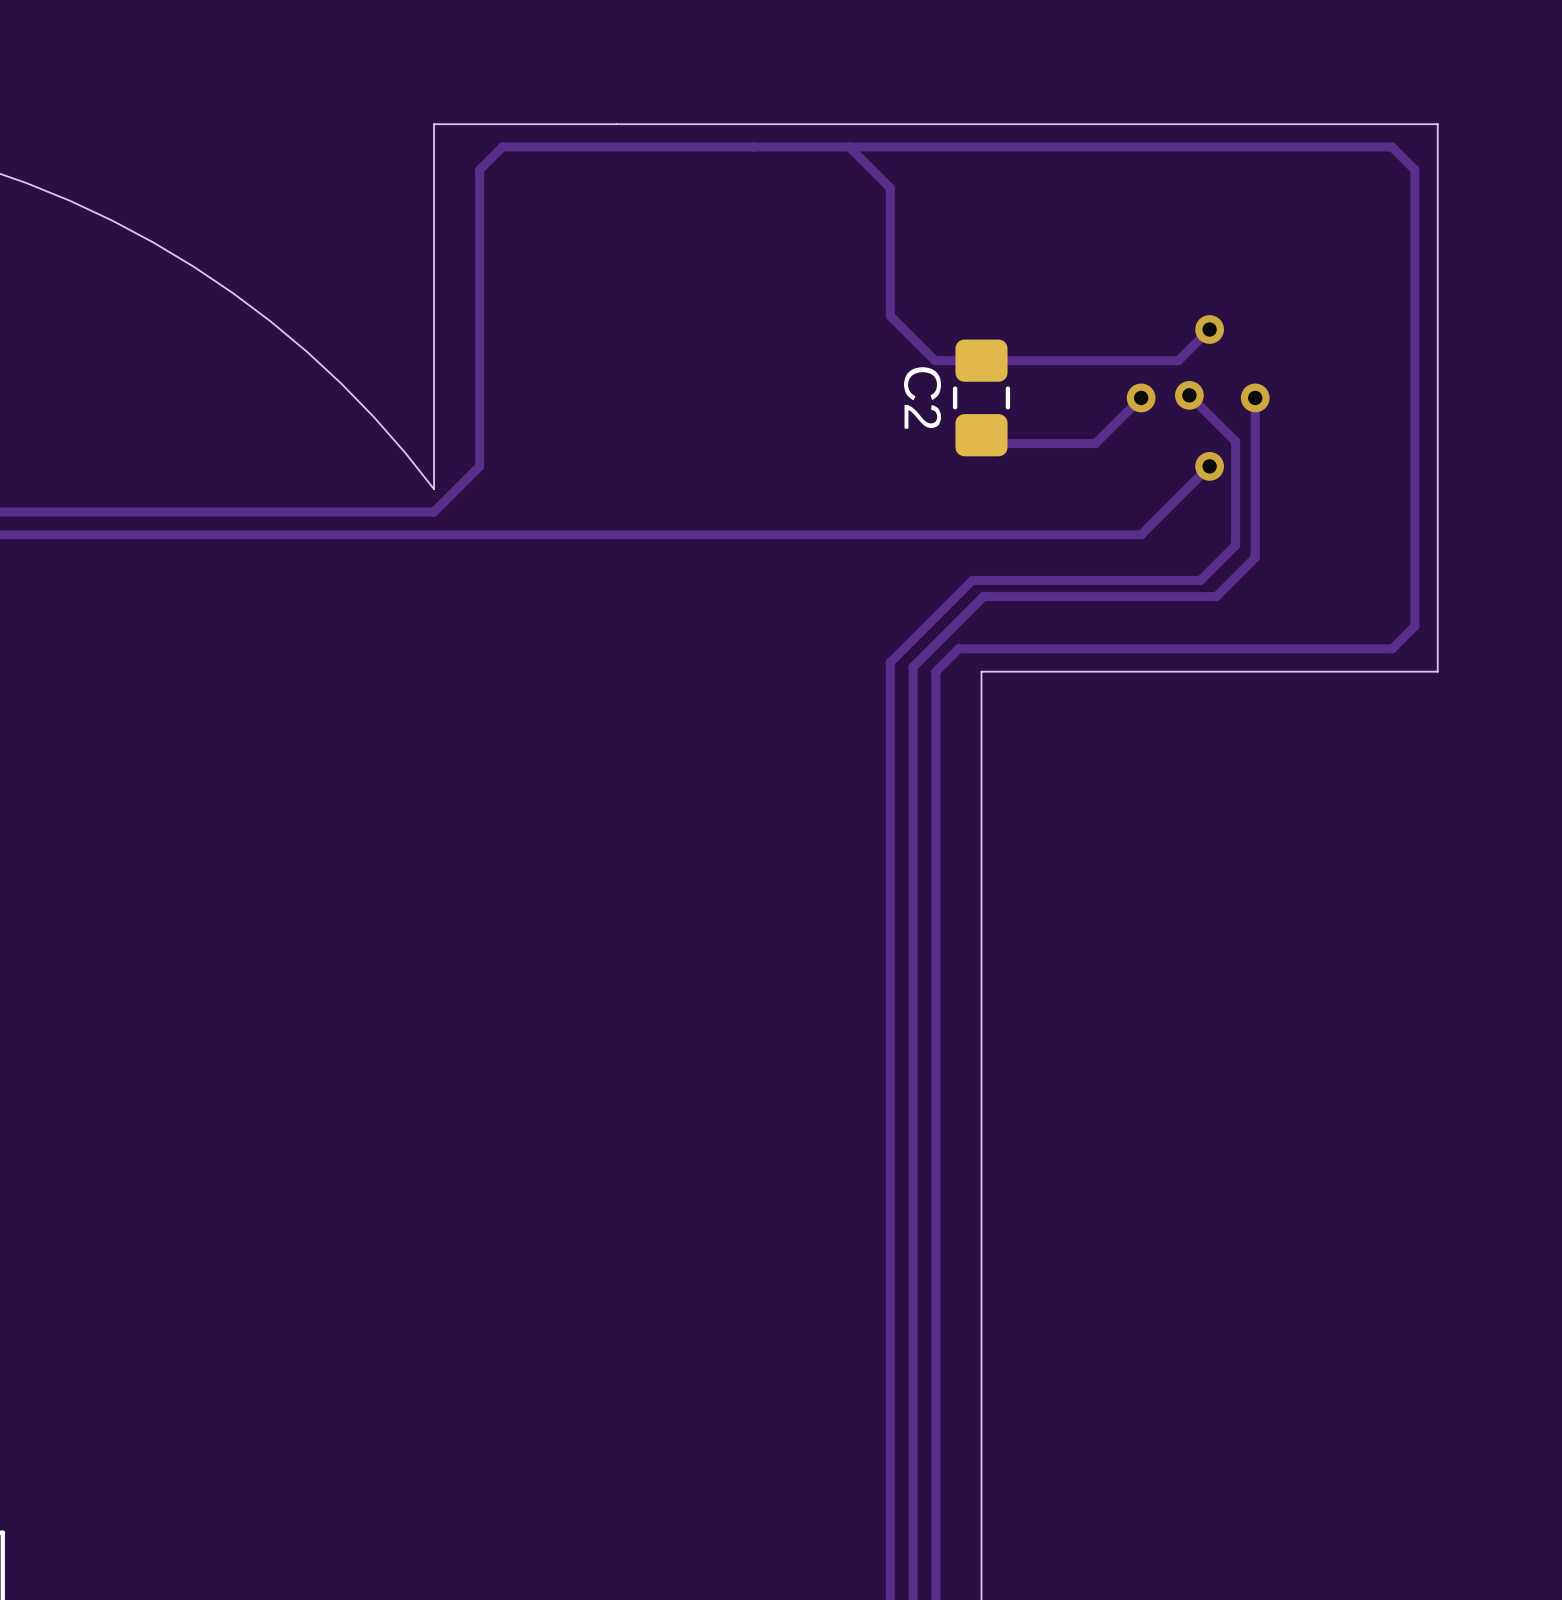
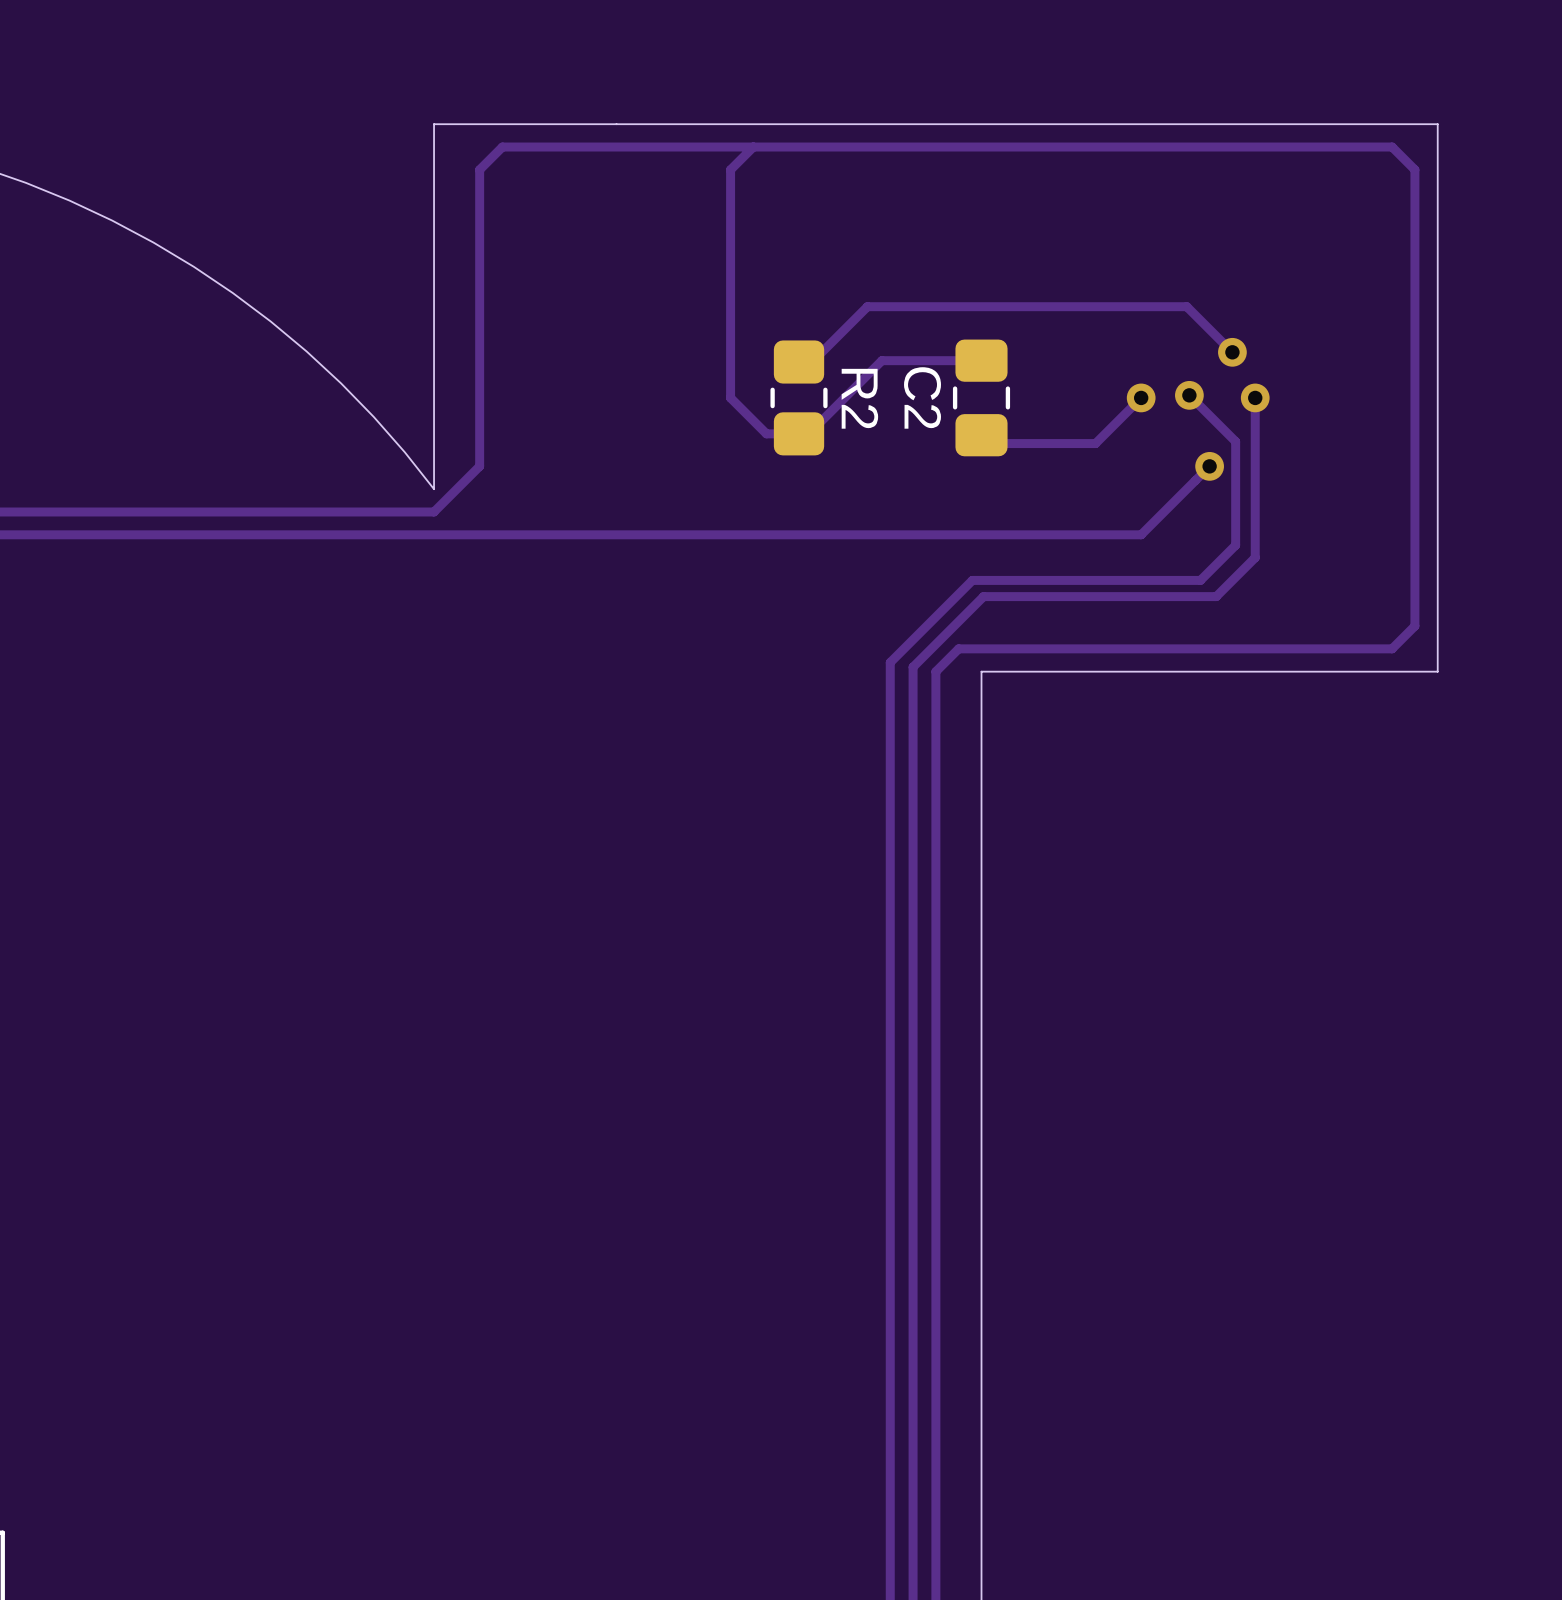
track: (849, 147) (890, 188) (890, 315) (935, 360) -> (753, 147) (730, 169) (730, 397) (766, 433) (808, 433) (881, 360) (935, 360)
track: (1209, 329) (1178, 360) (981, 360) -> none
via position: (1209, 329) -> (1232, 352)
track: none -> (1232, 352) (1186, 306) (867, 306) (812, 362) (799, 362)
R2: none -> (799, 397)

